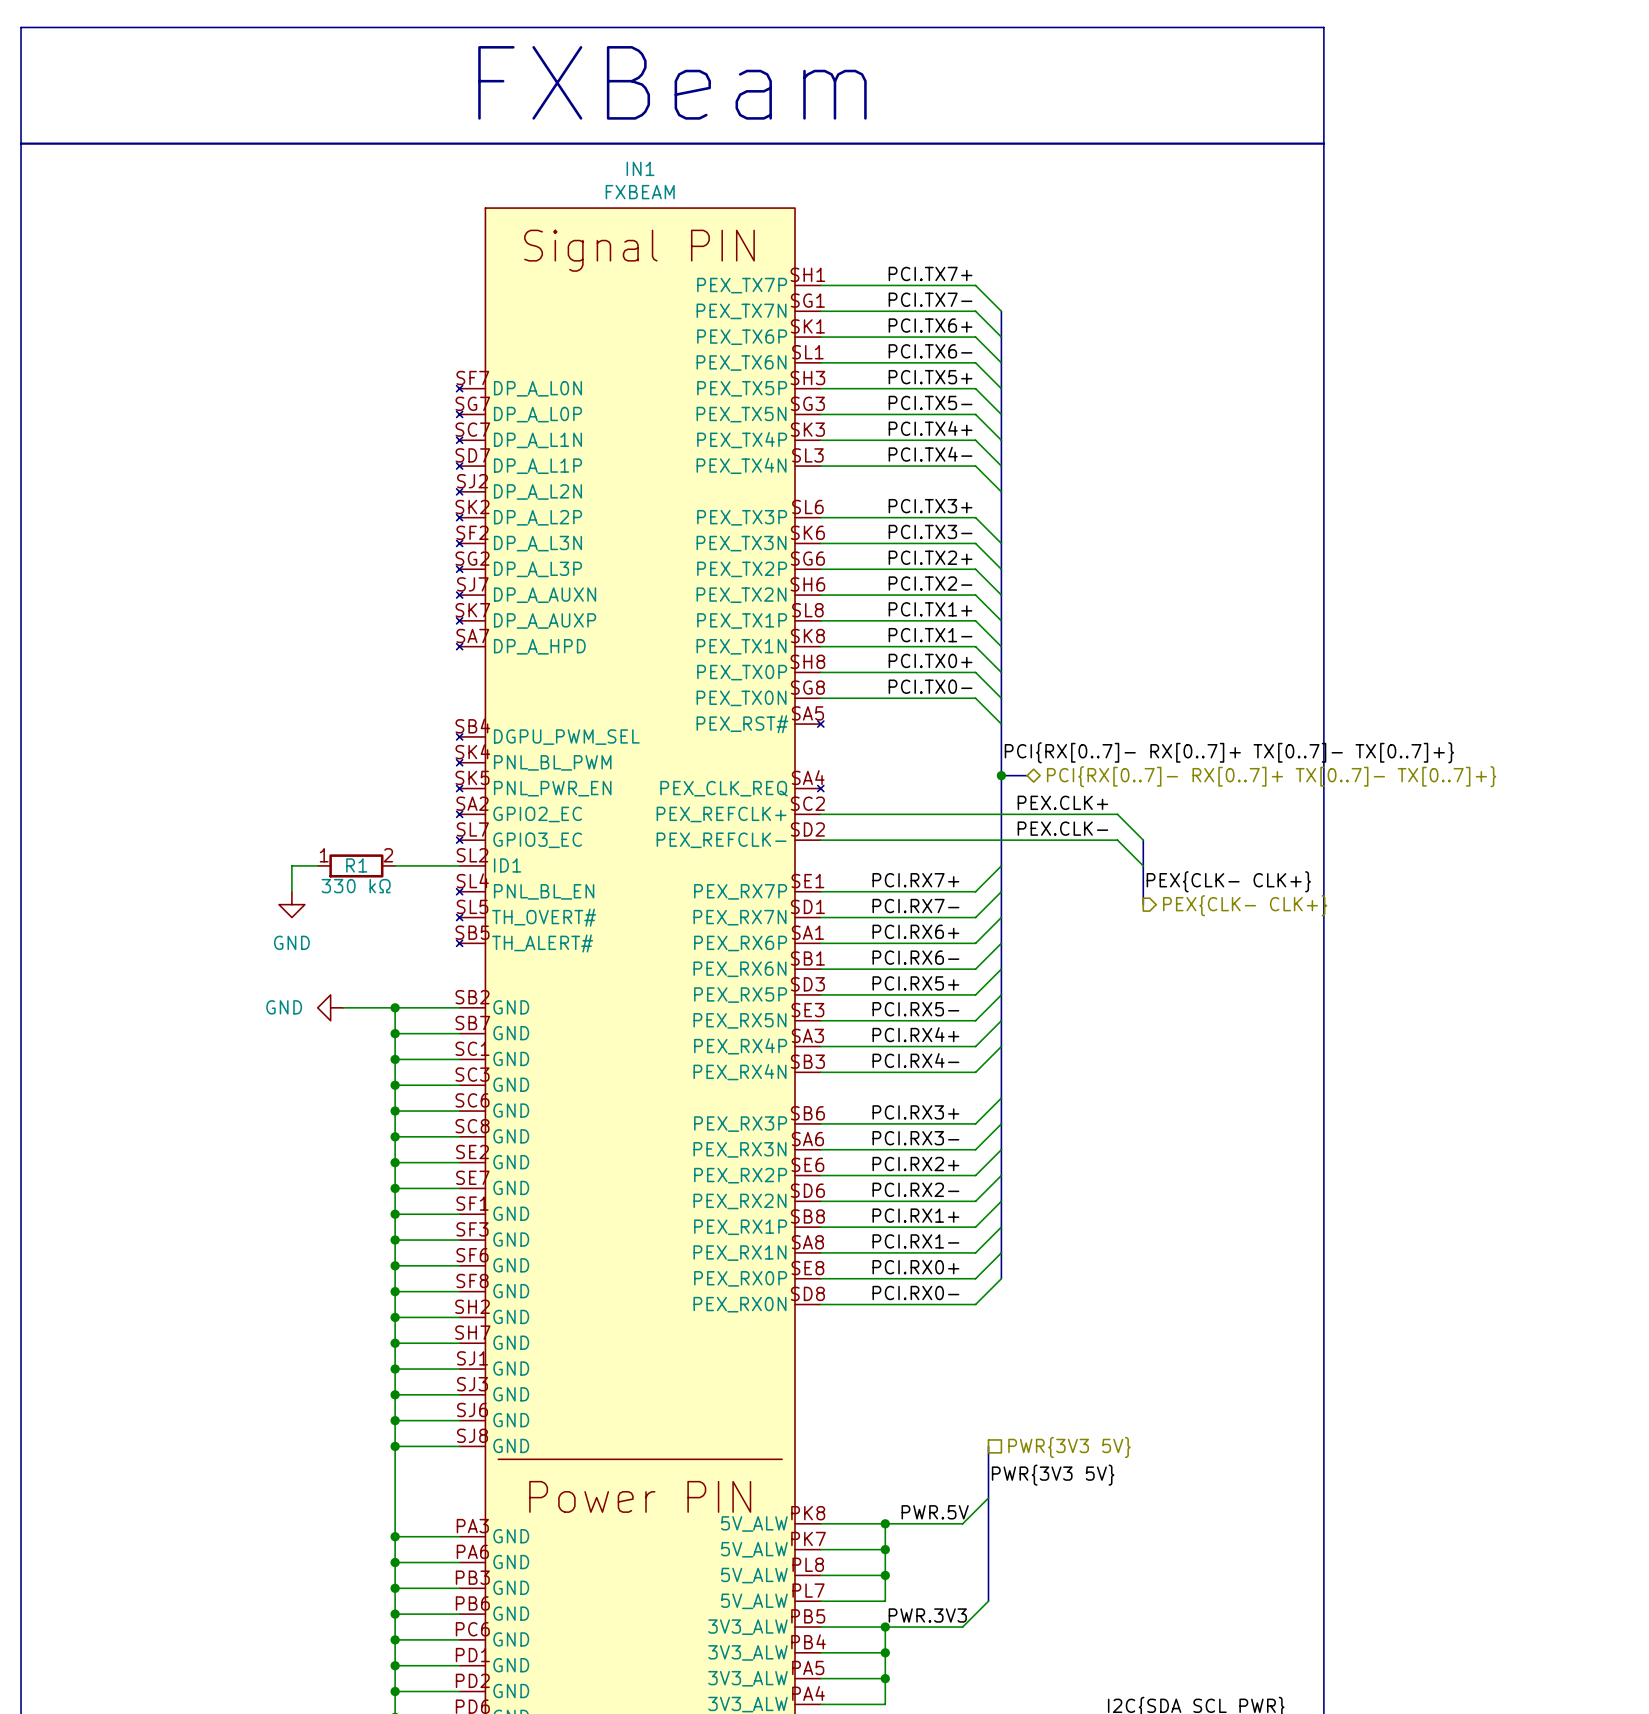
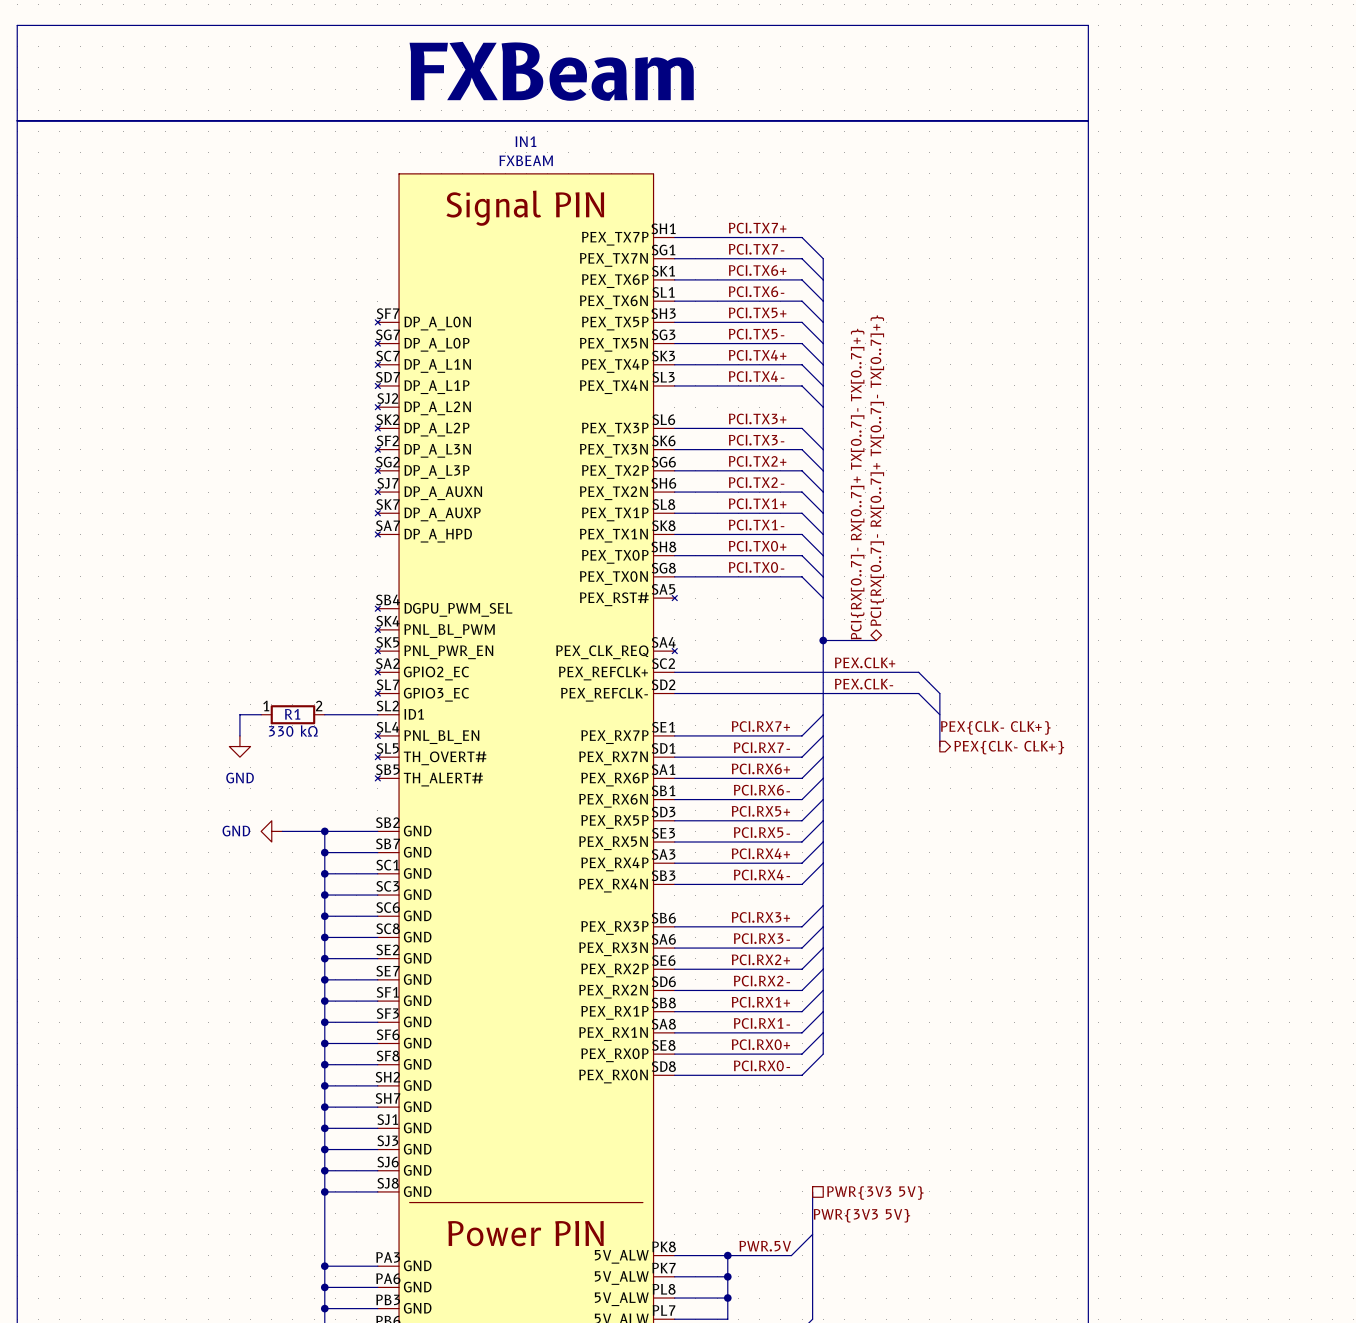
label rotation: 0° (1229, 752) -> 90° counterclockwise (857, 484)
bus: none -> (844, 640) (876, 640)
hierarchical label rotation: 0° (1271, 776) -> 90° counterclockwise (877, 470)

